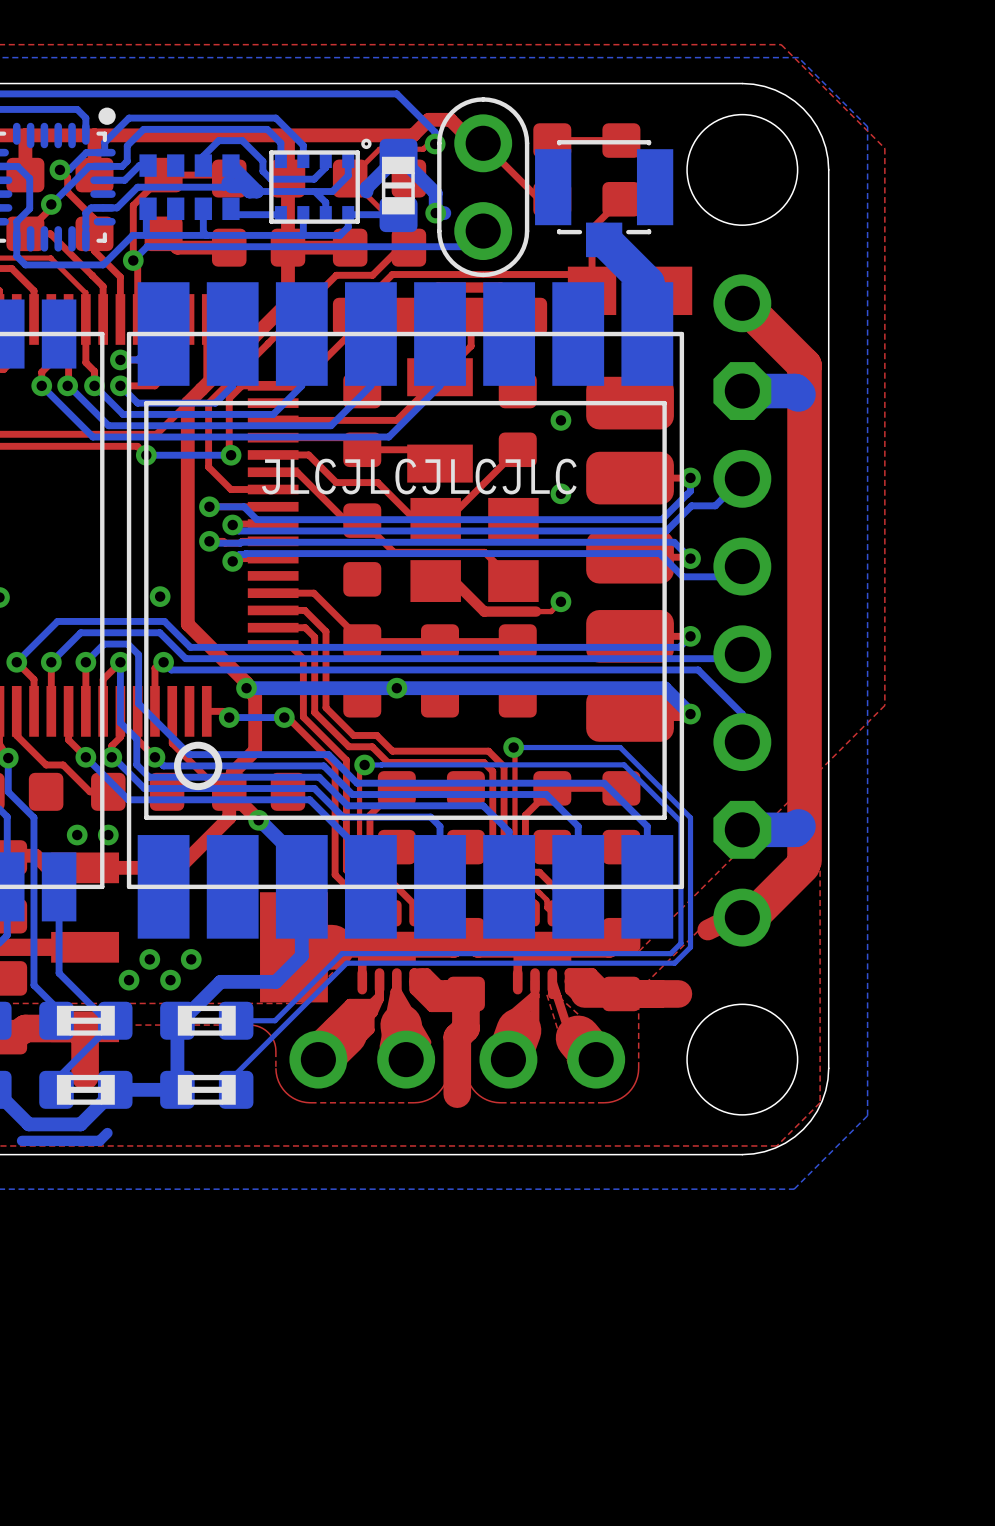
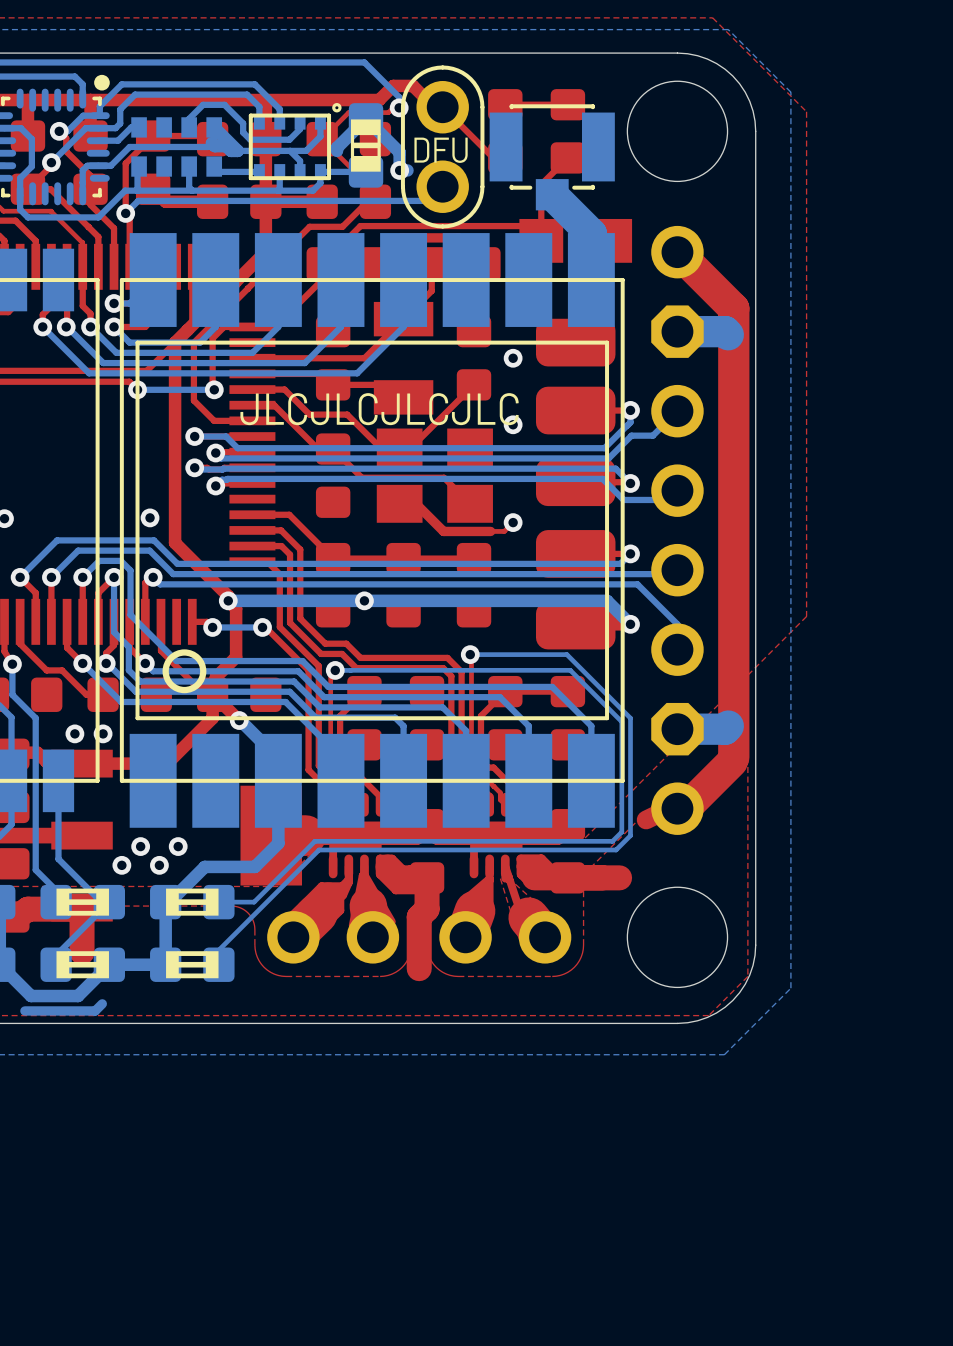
text: none -> DFU (441, 150)

